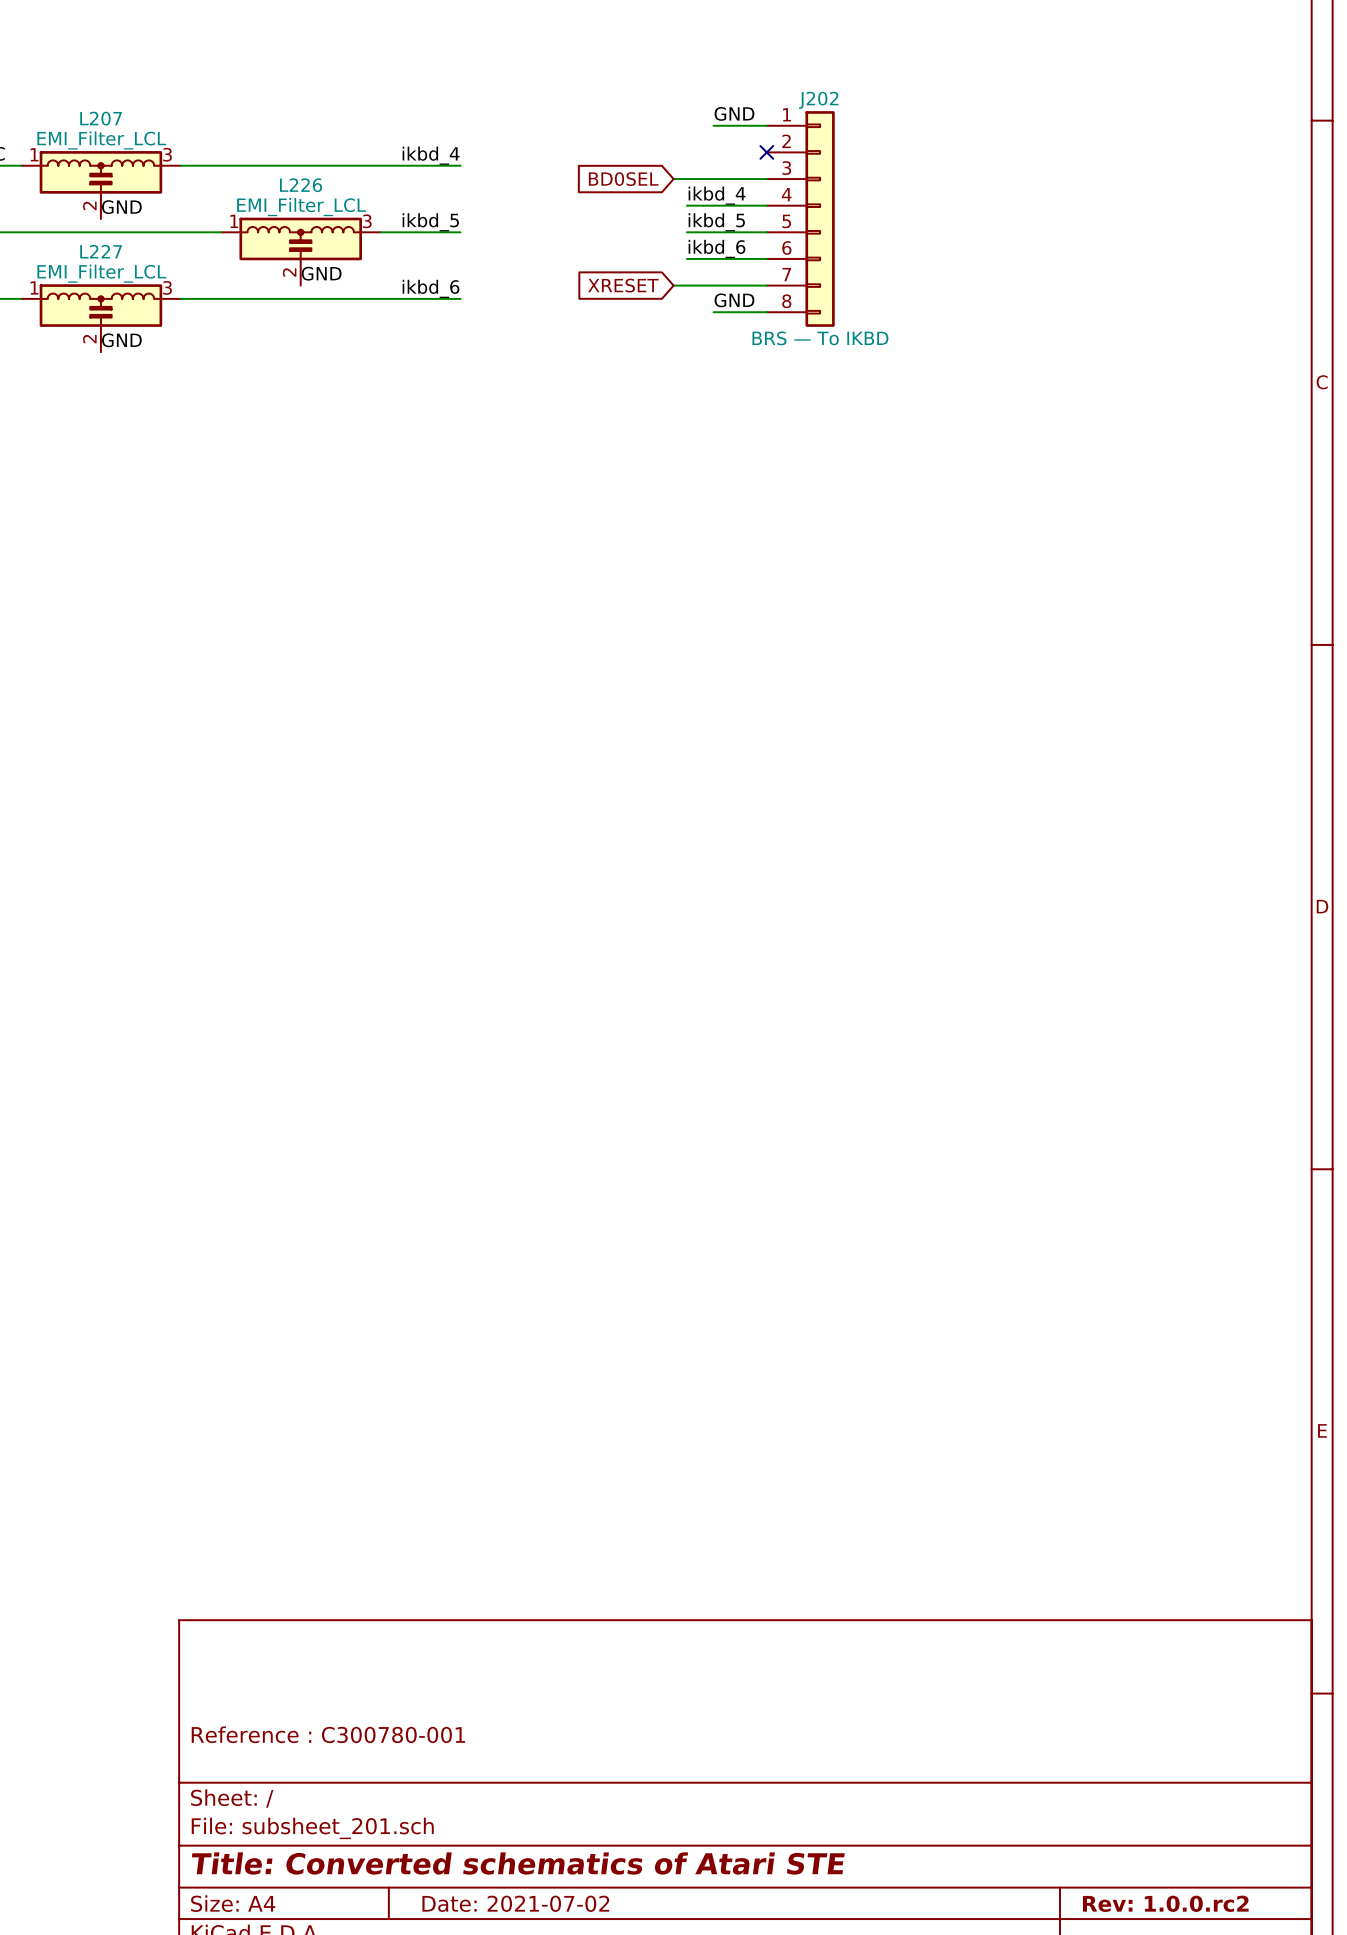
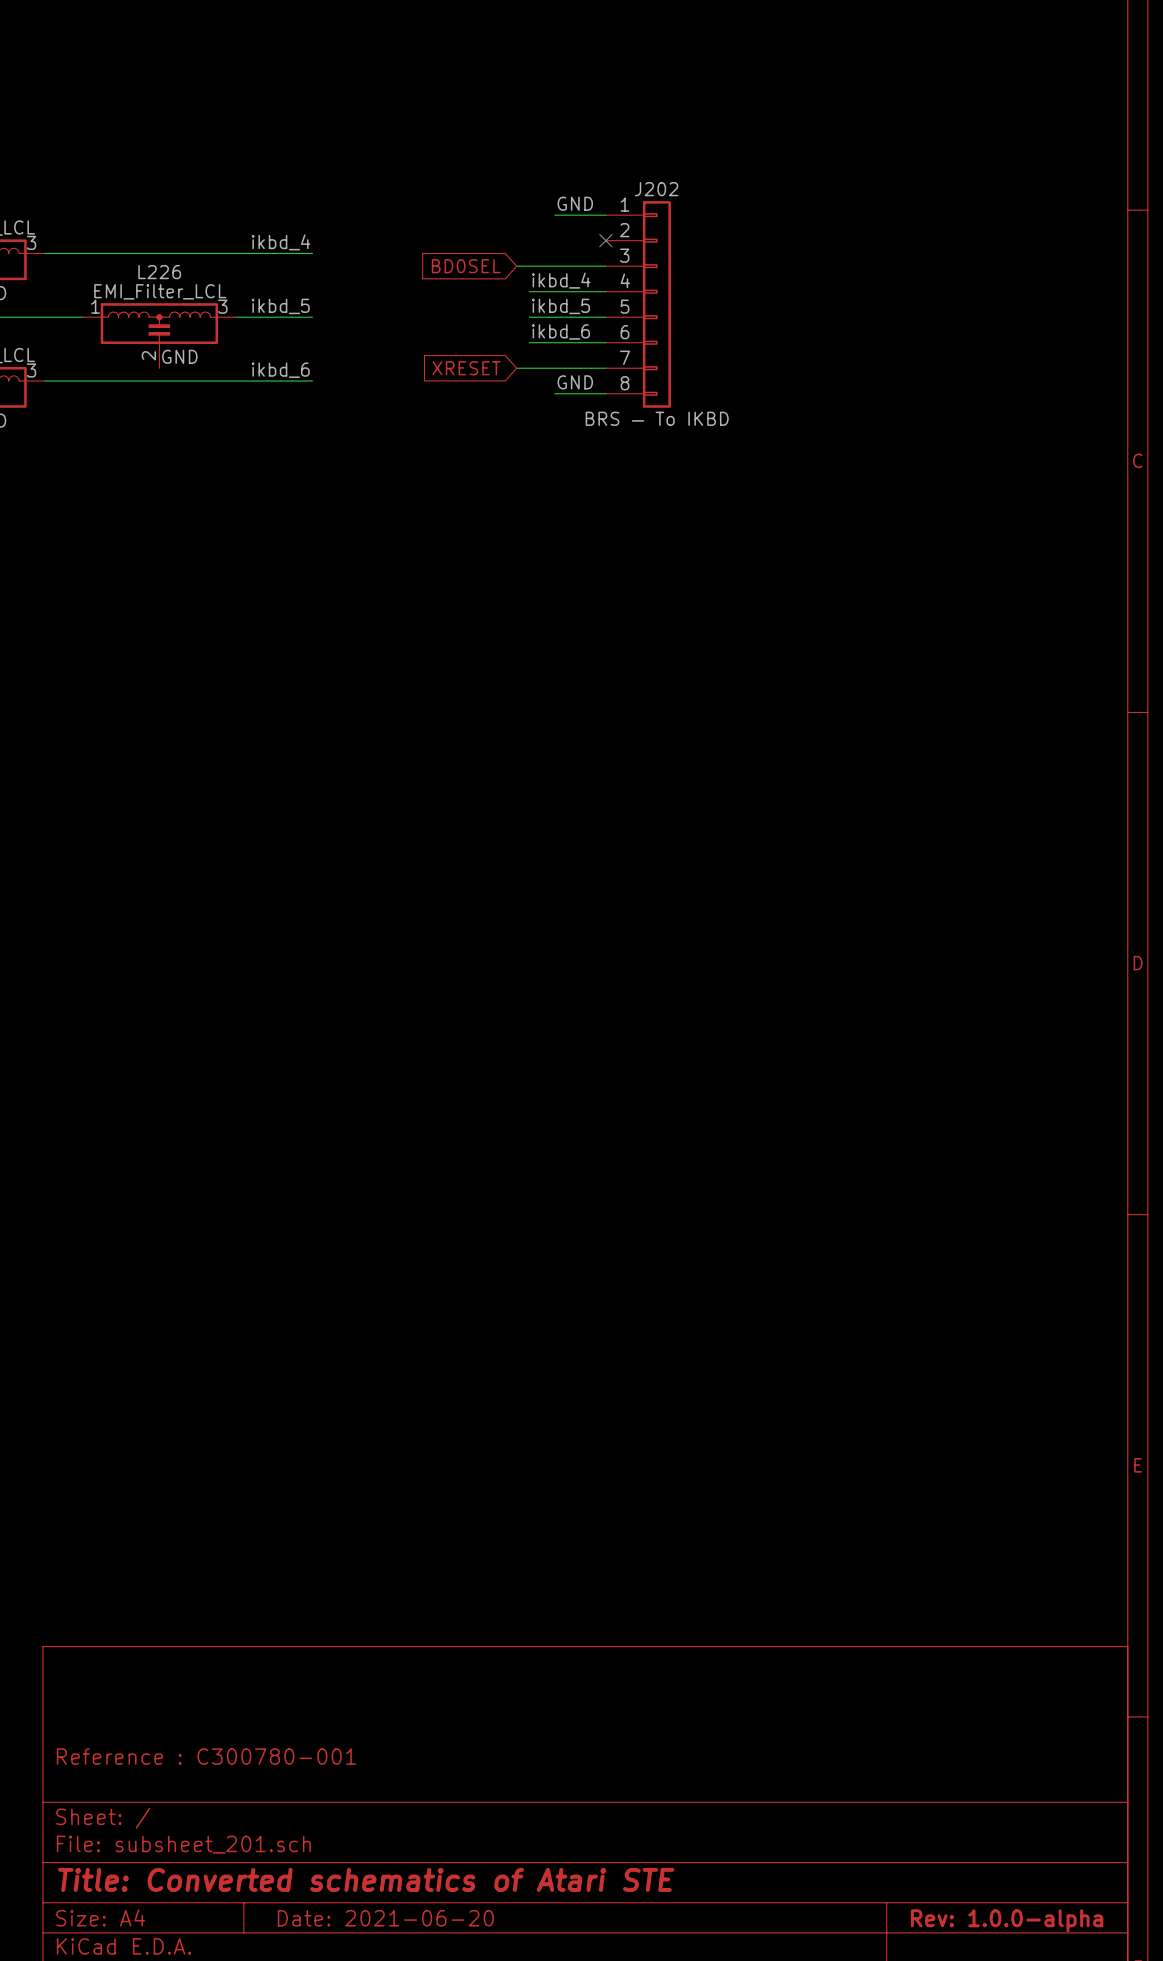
title block: Date: 2021-07-02 (515, 1903) -> Date: 2021-06-20 (385, 1918)
title block: Rev: 1.0.0.rc2 (1165, 1903) -> Rev: 1.0.0-alpha (1007, 1920)

